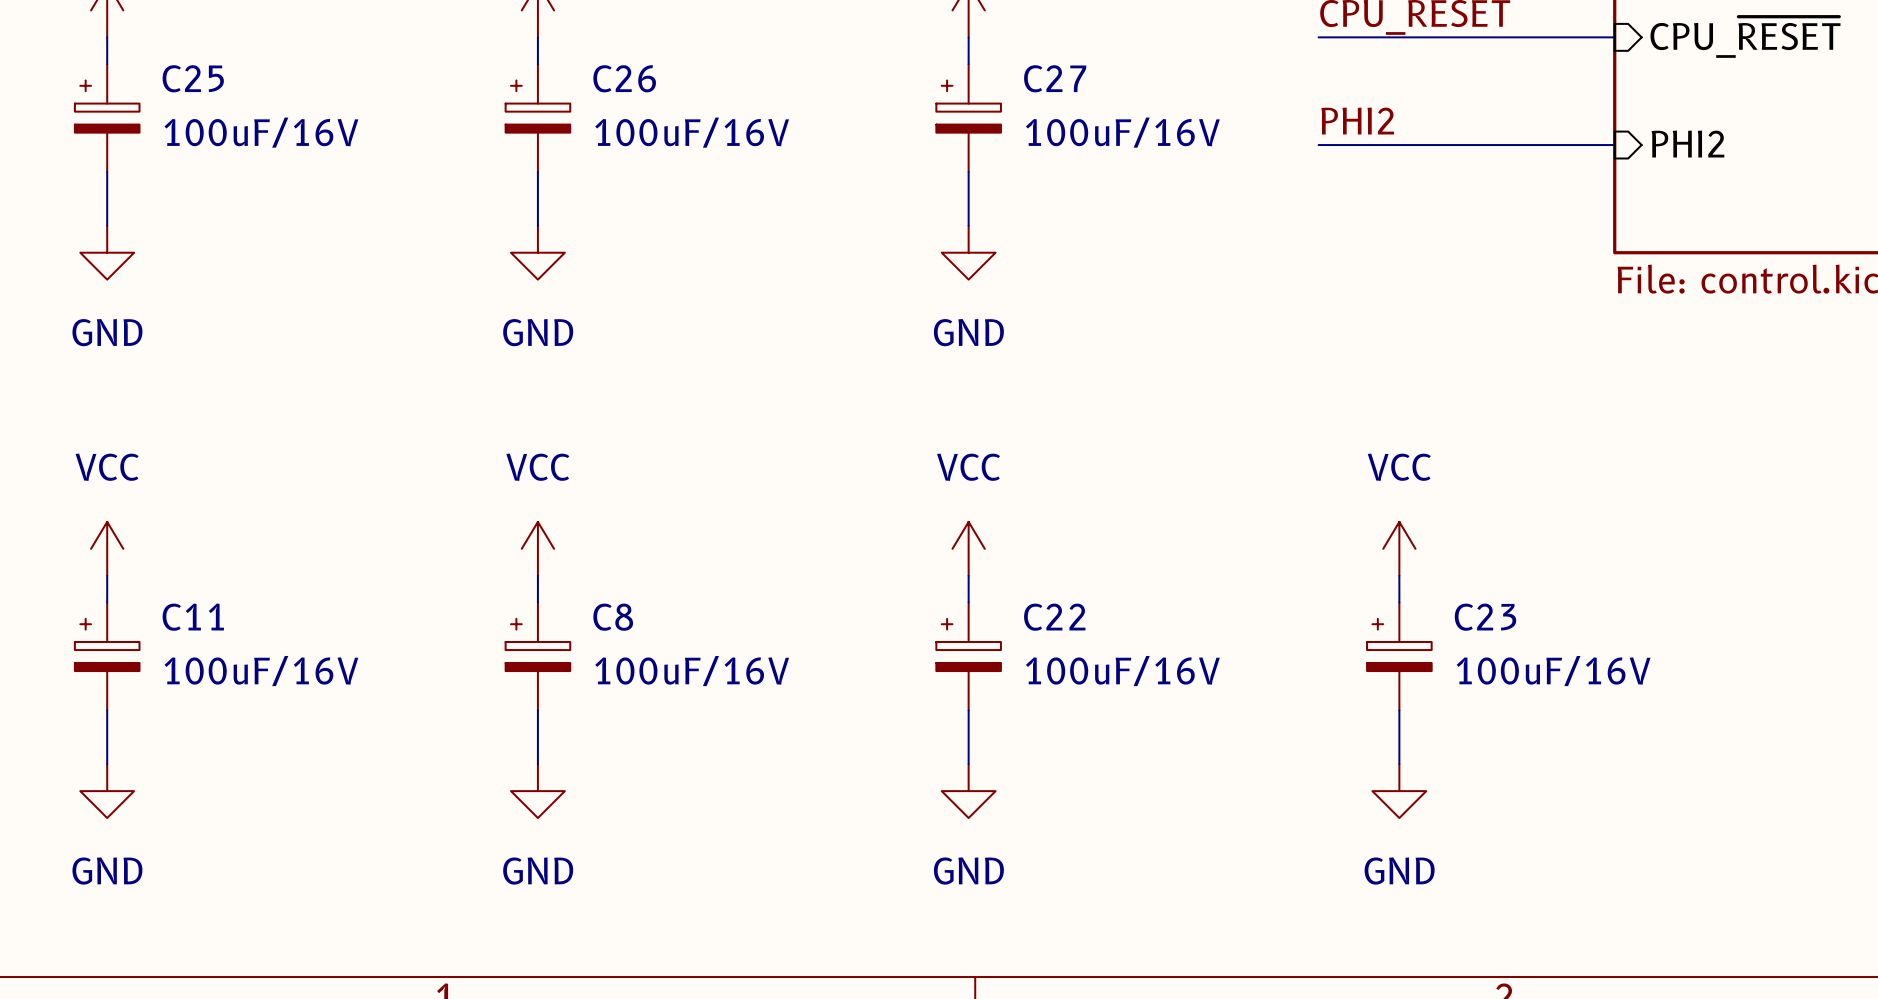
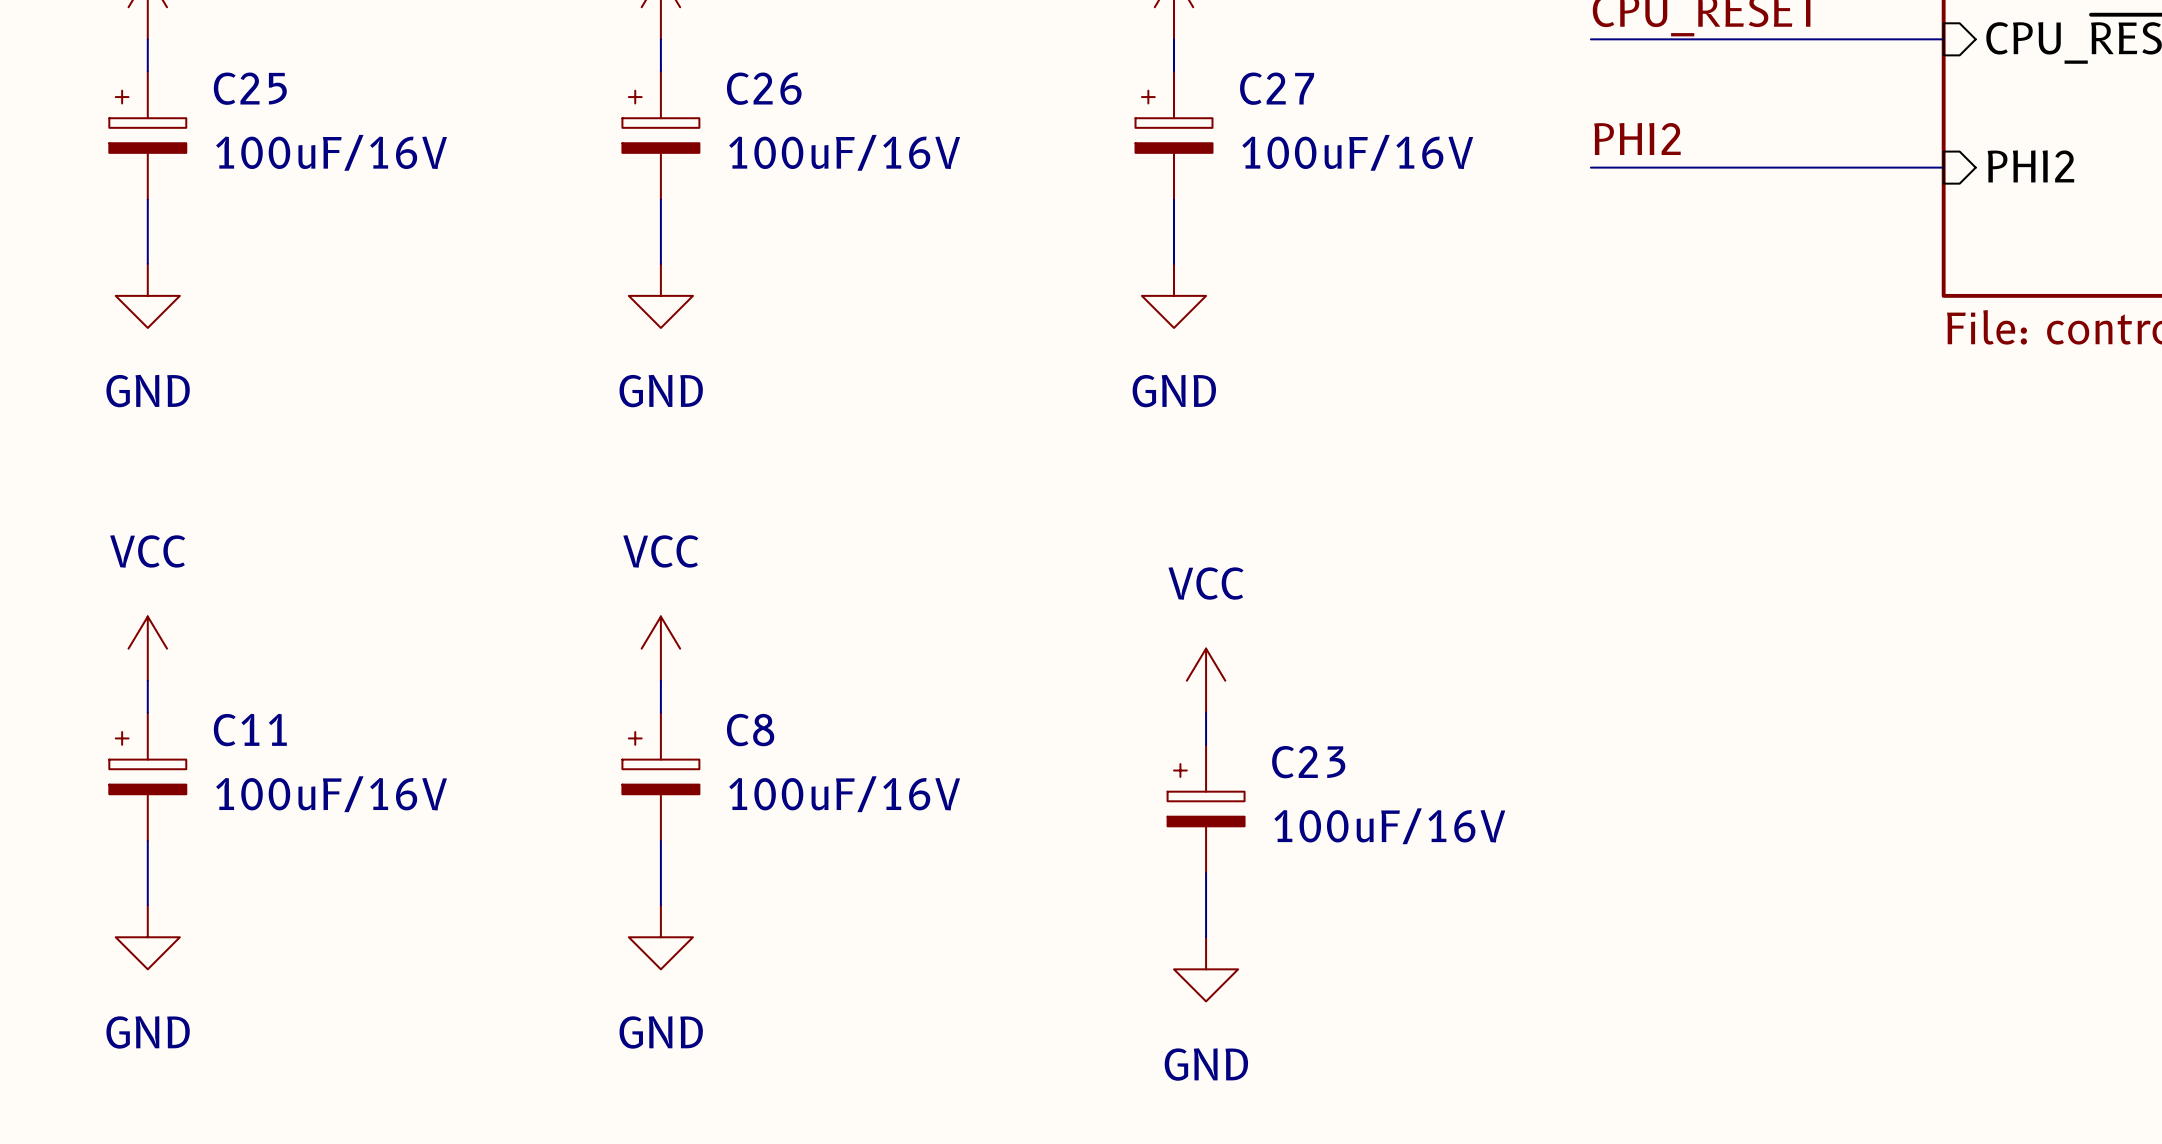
power symbol position: VCC (968, 548) -> VCC (1206, 680)
power symbol: VCC (1399, 548) -> none
wire: (968, 575) (968, 602) -> (1206, 712) (1206, 744)
wire: (1399, 575) (1399, 602) -> none
C22: 100uF/16V (968, 656) -> none
C23 position: (1399, 656) -> (1206, 808)
wire: (968, 710) (968, 764) -> (1206, 873) (1206, 937)
wire: (1399, 710) (1399, 764) -> none
power symbol position: GND (968, 791) -> GND (1206, 969)
power symbol: GND (1399, 791) -> none

